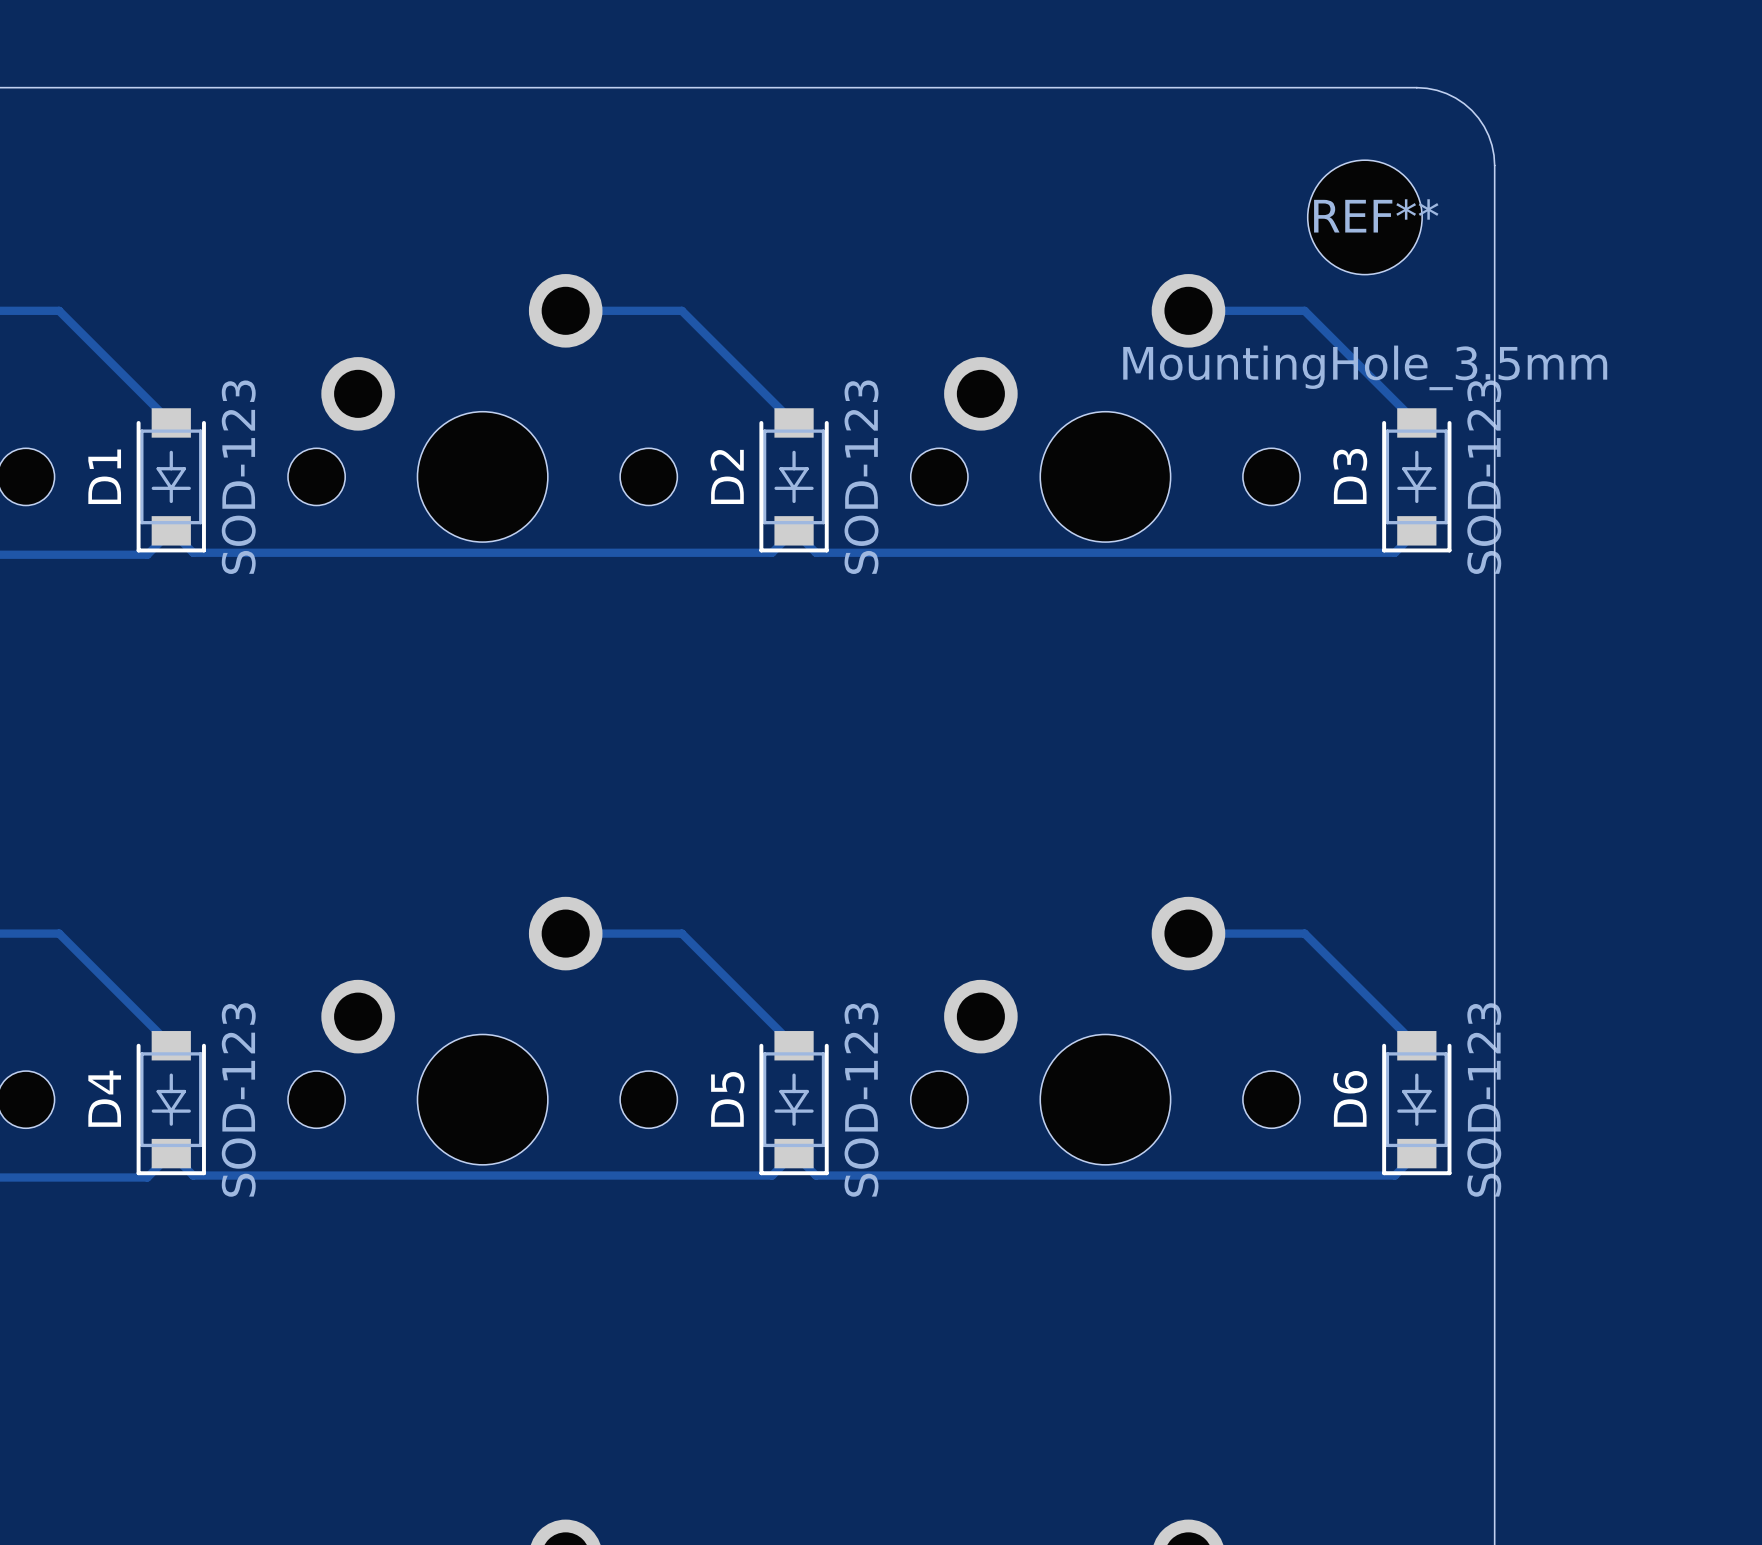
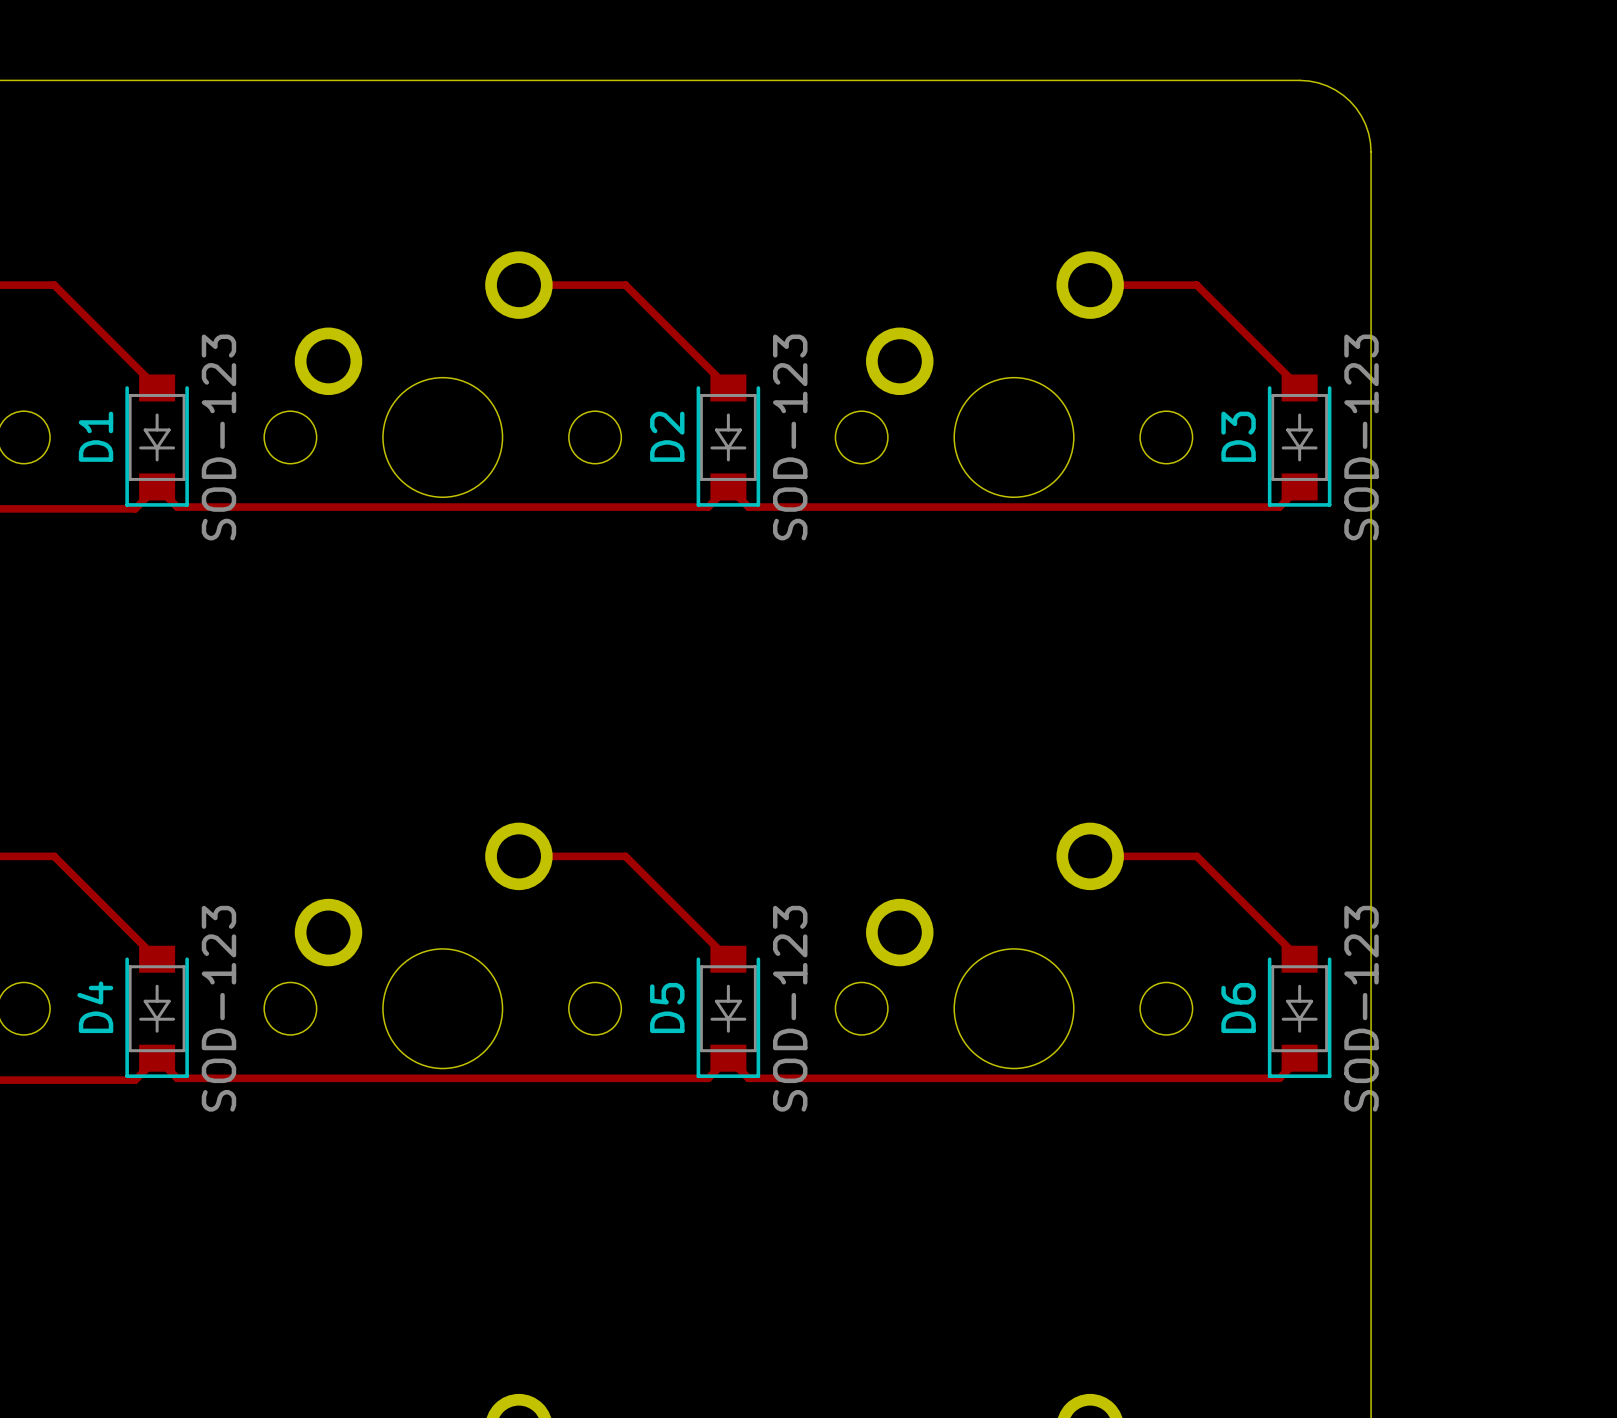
REF**: MountingHole_3.5mm (1364, 217) -> none

